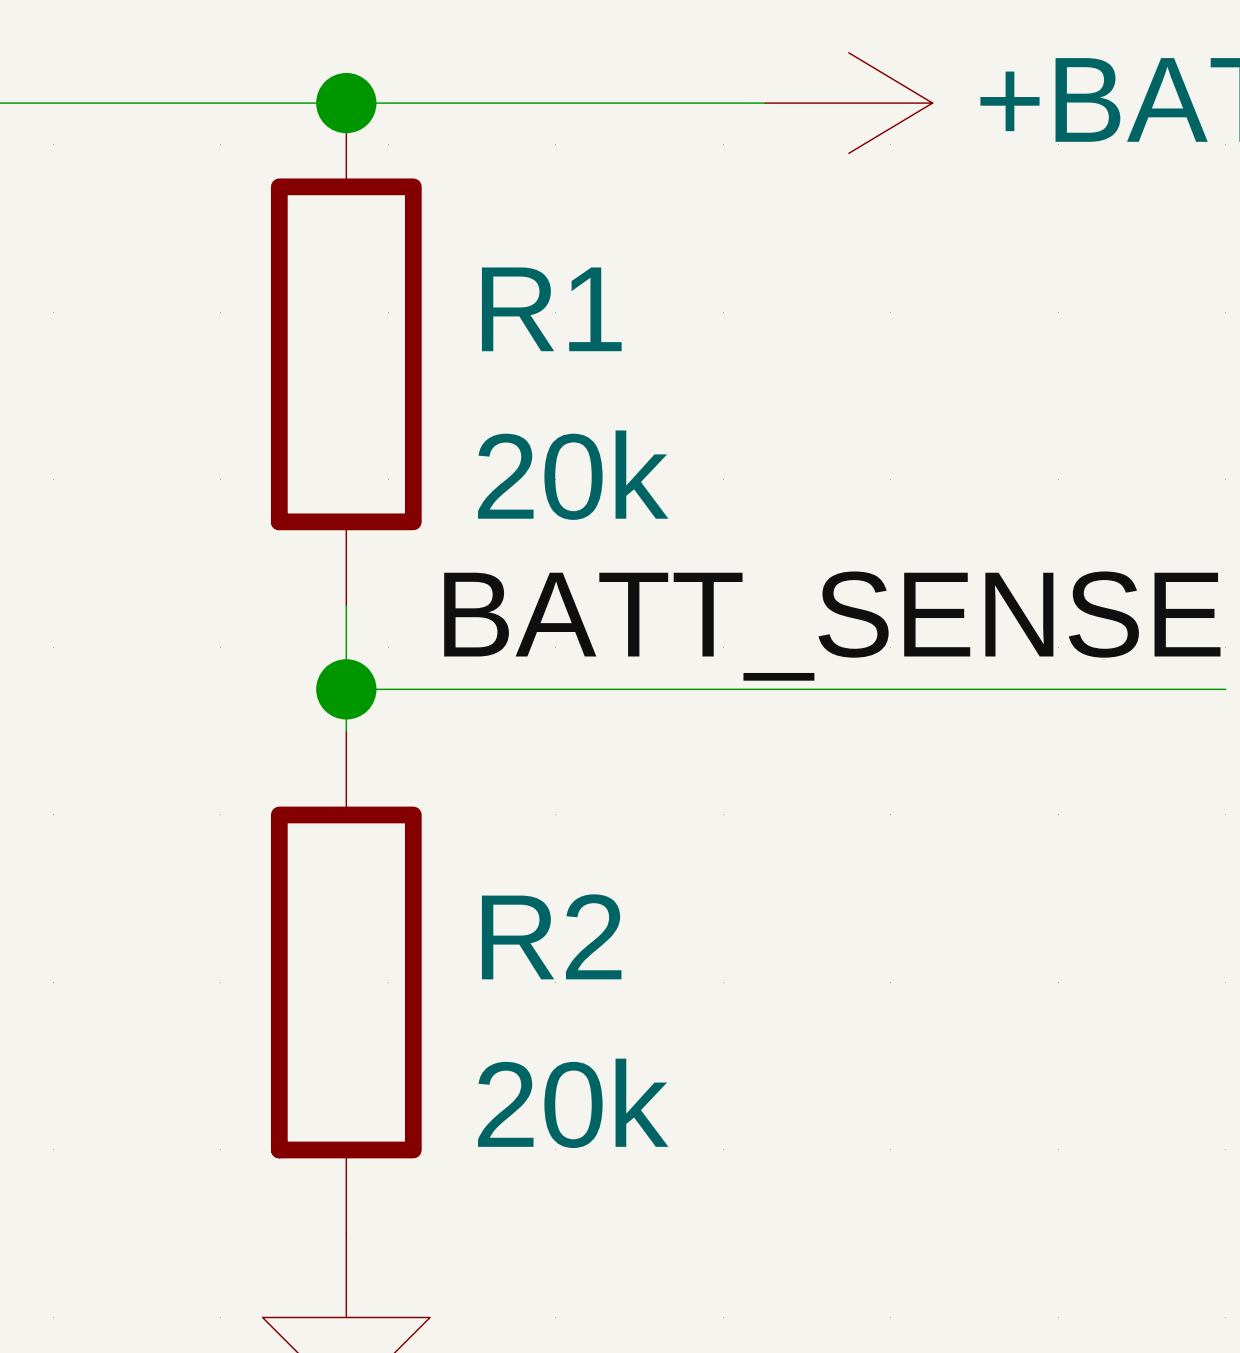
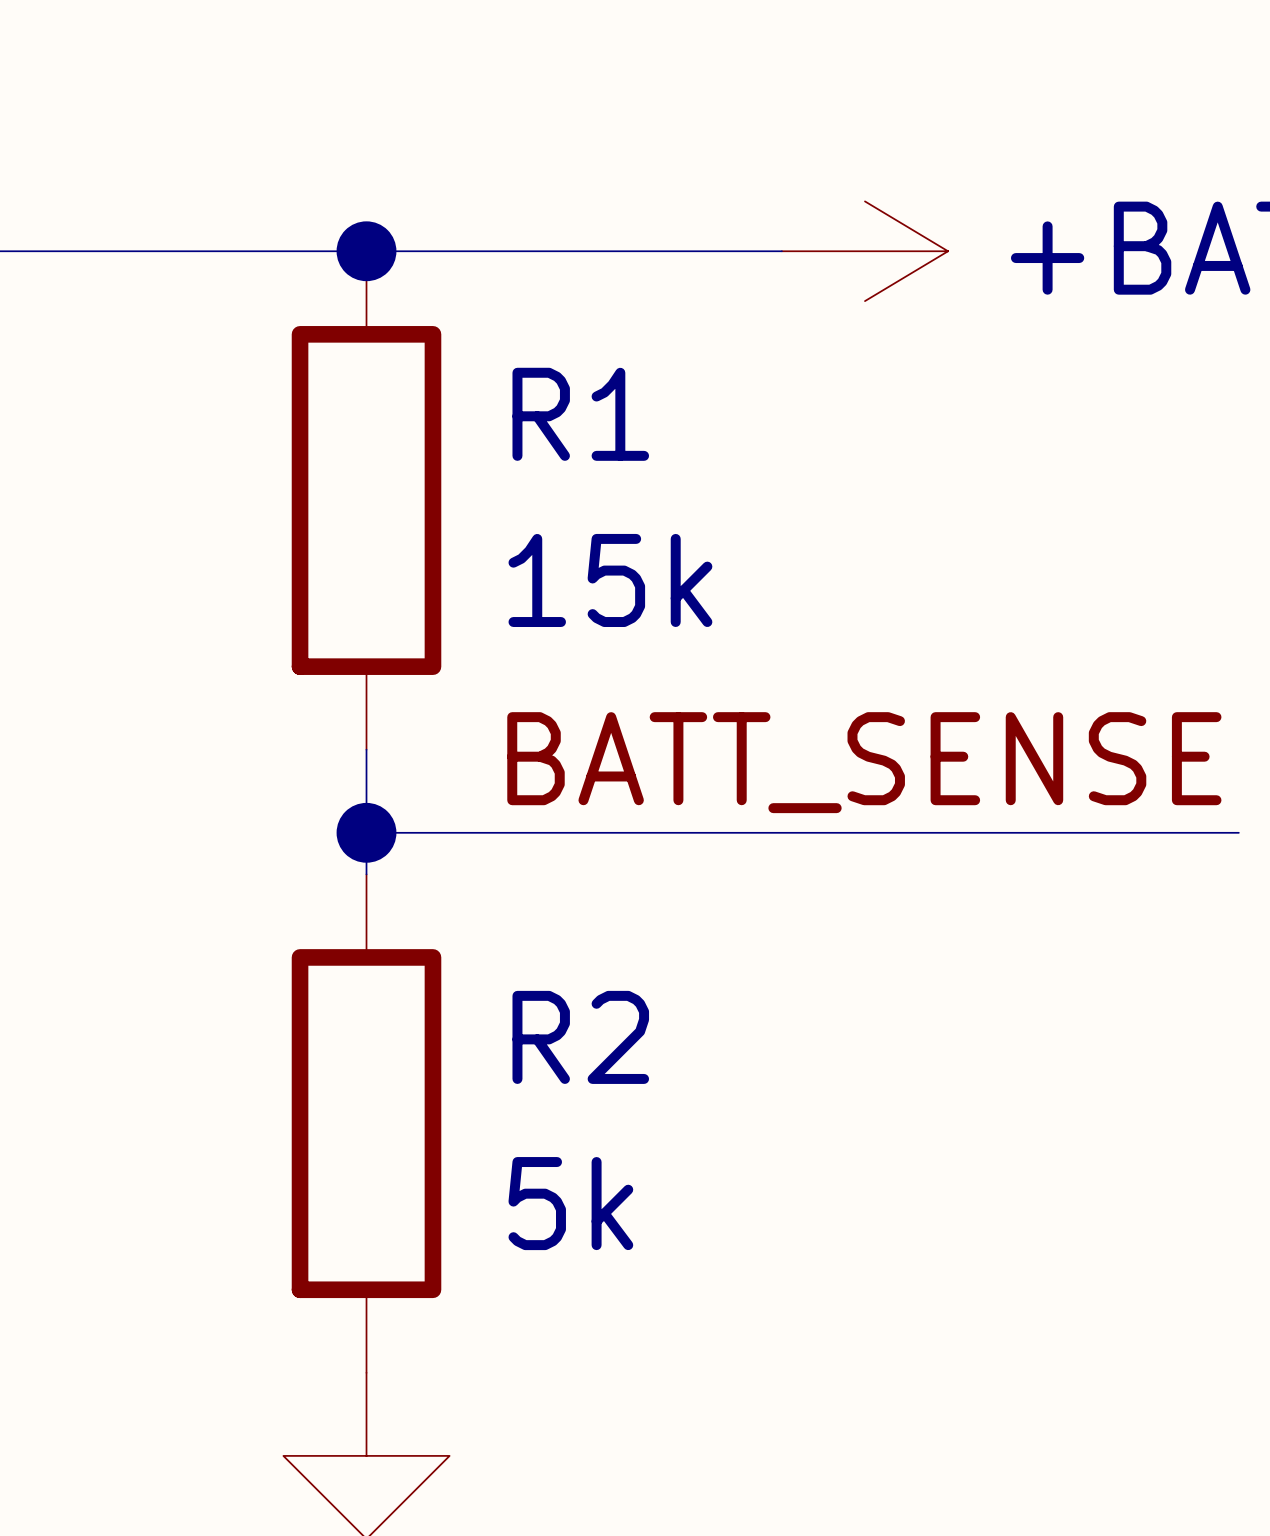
R1 name position: R1 (551, 309) -> R1 (580, 414)
R1 value: 20k (573, 475) -> 15k (610, 580)
R2 name position: R2 (551, 936) -> R2 (580, 1037)
R2 value: 20k (573, 1103) -> 5k (570, 1203)

